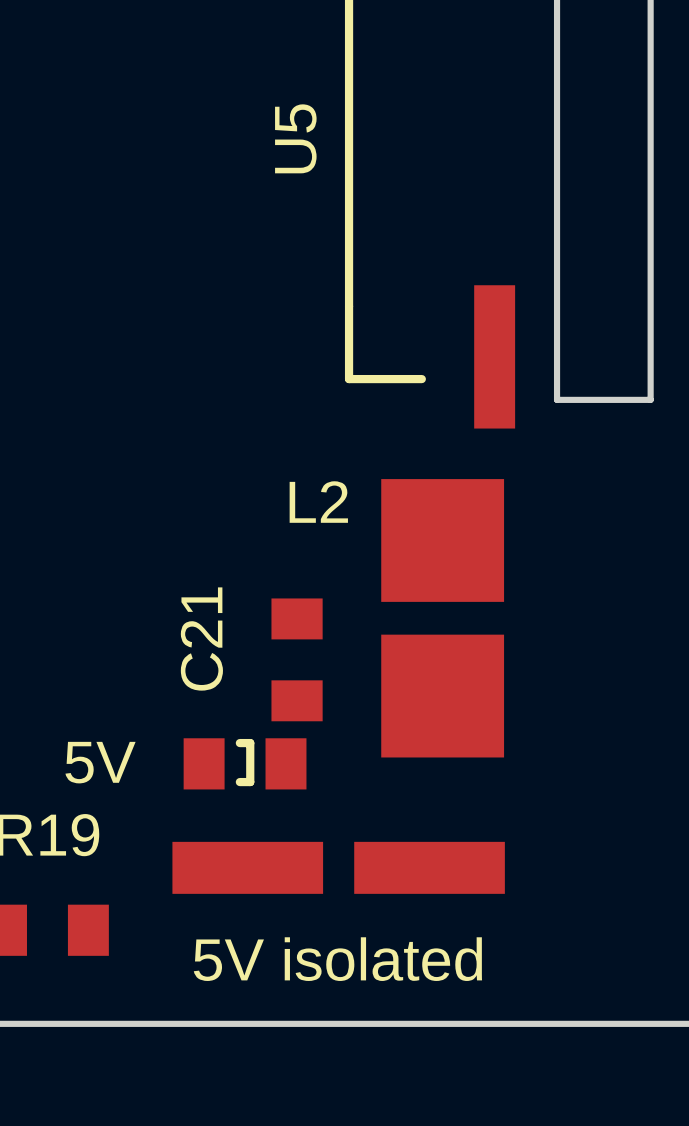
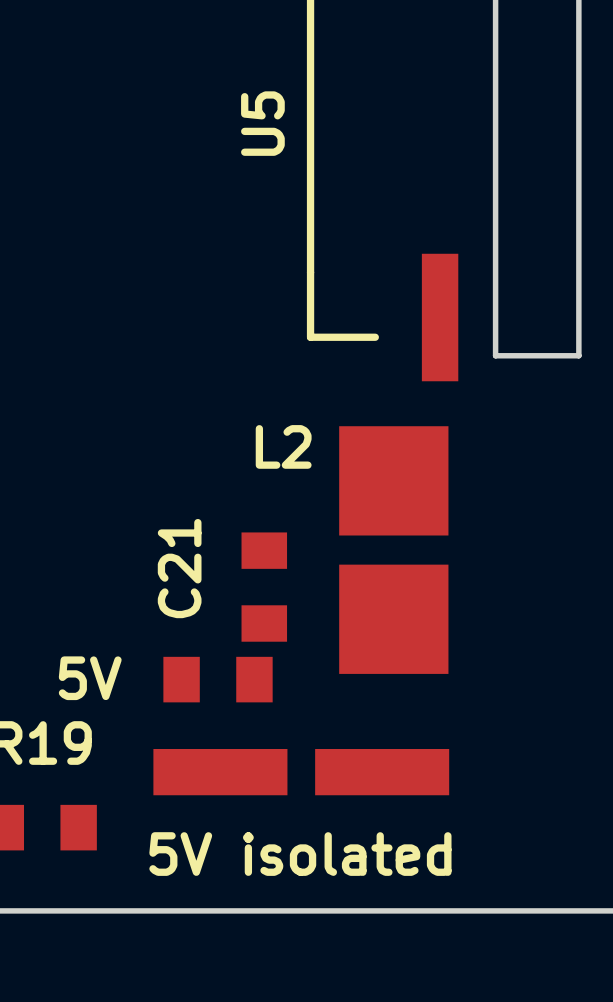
line: (239, 743) (250, 743) (250, 782) (239, 782) -> none

